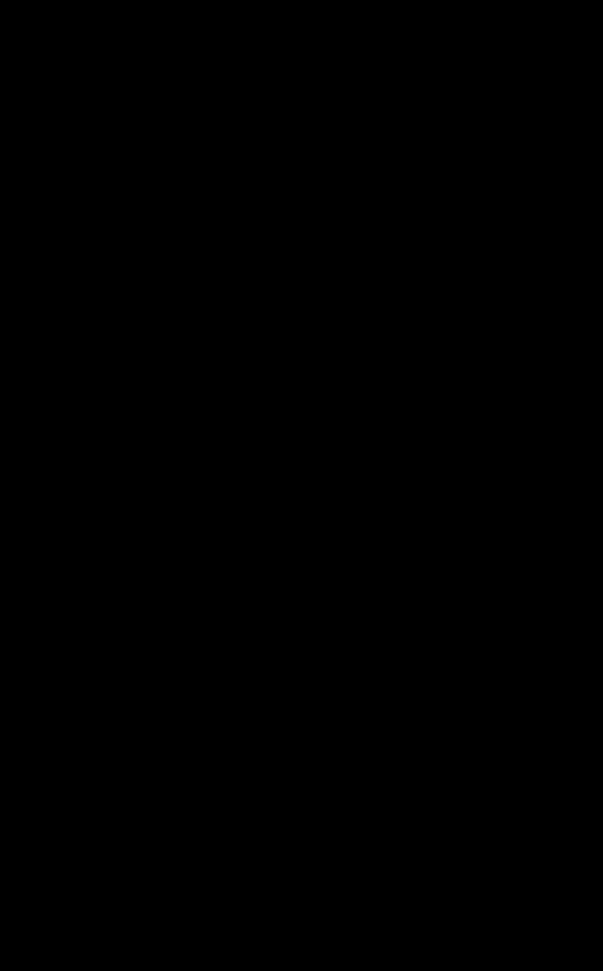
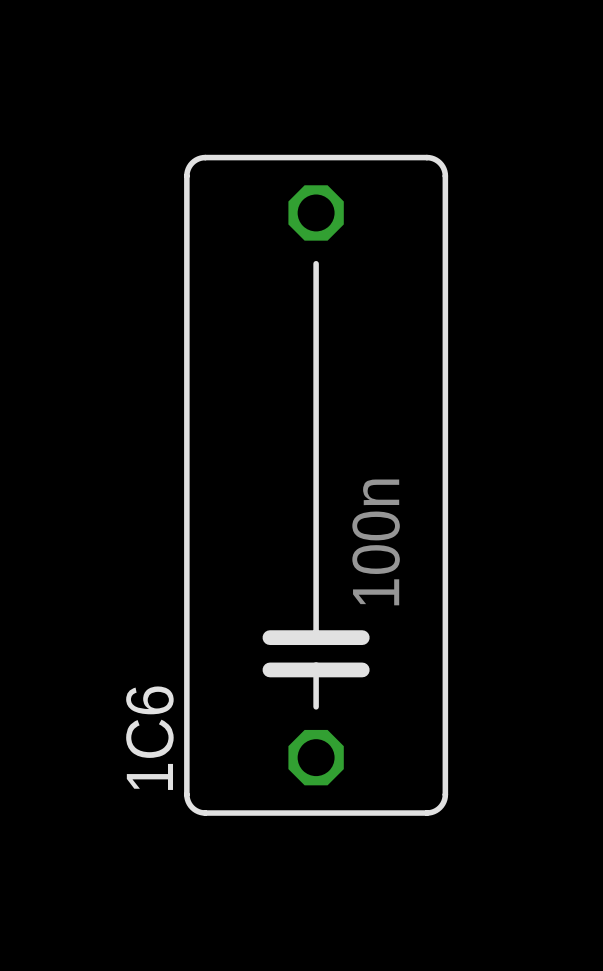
1C6: none -> 100n (316, 485)

